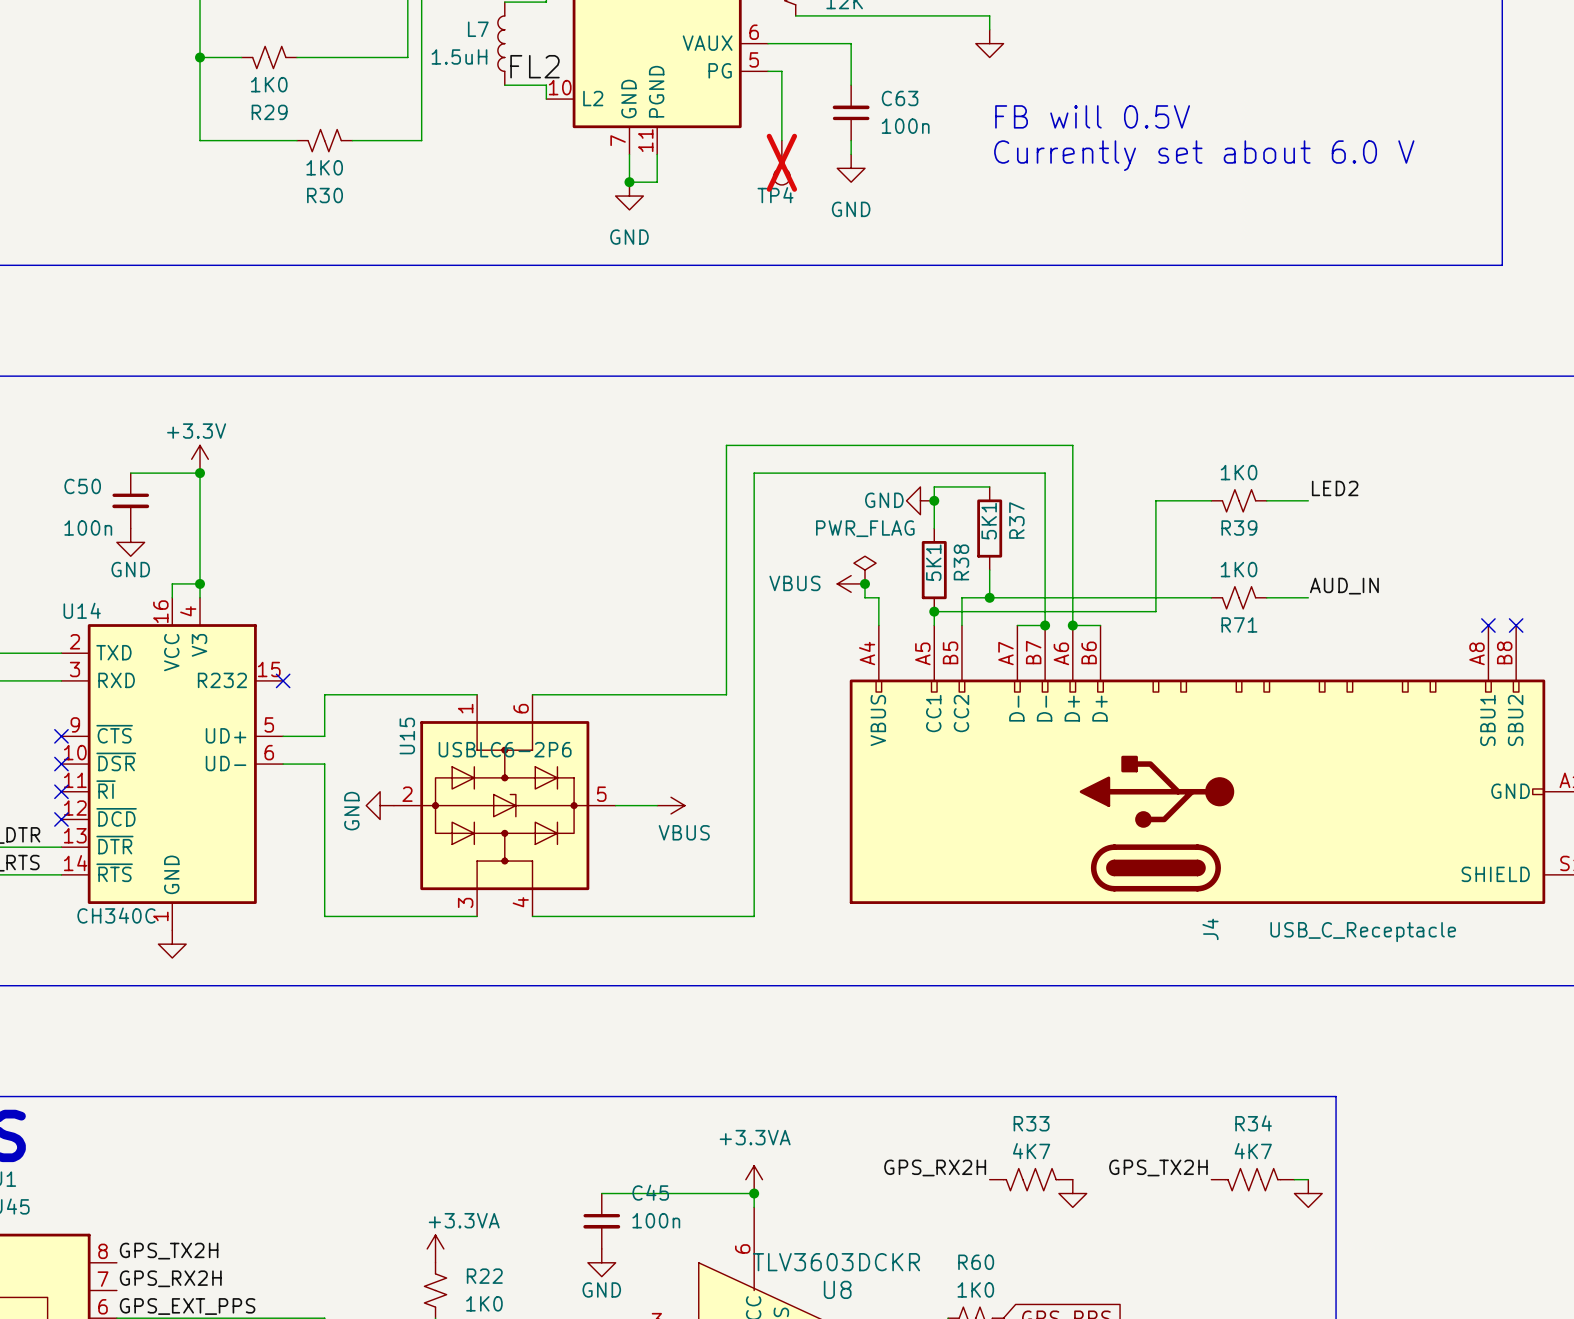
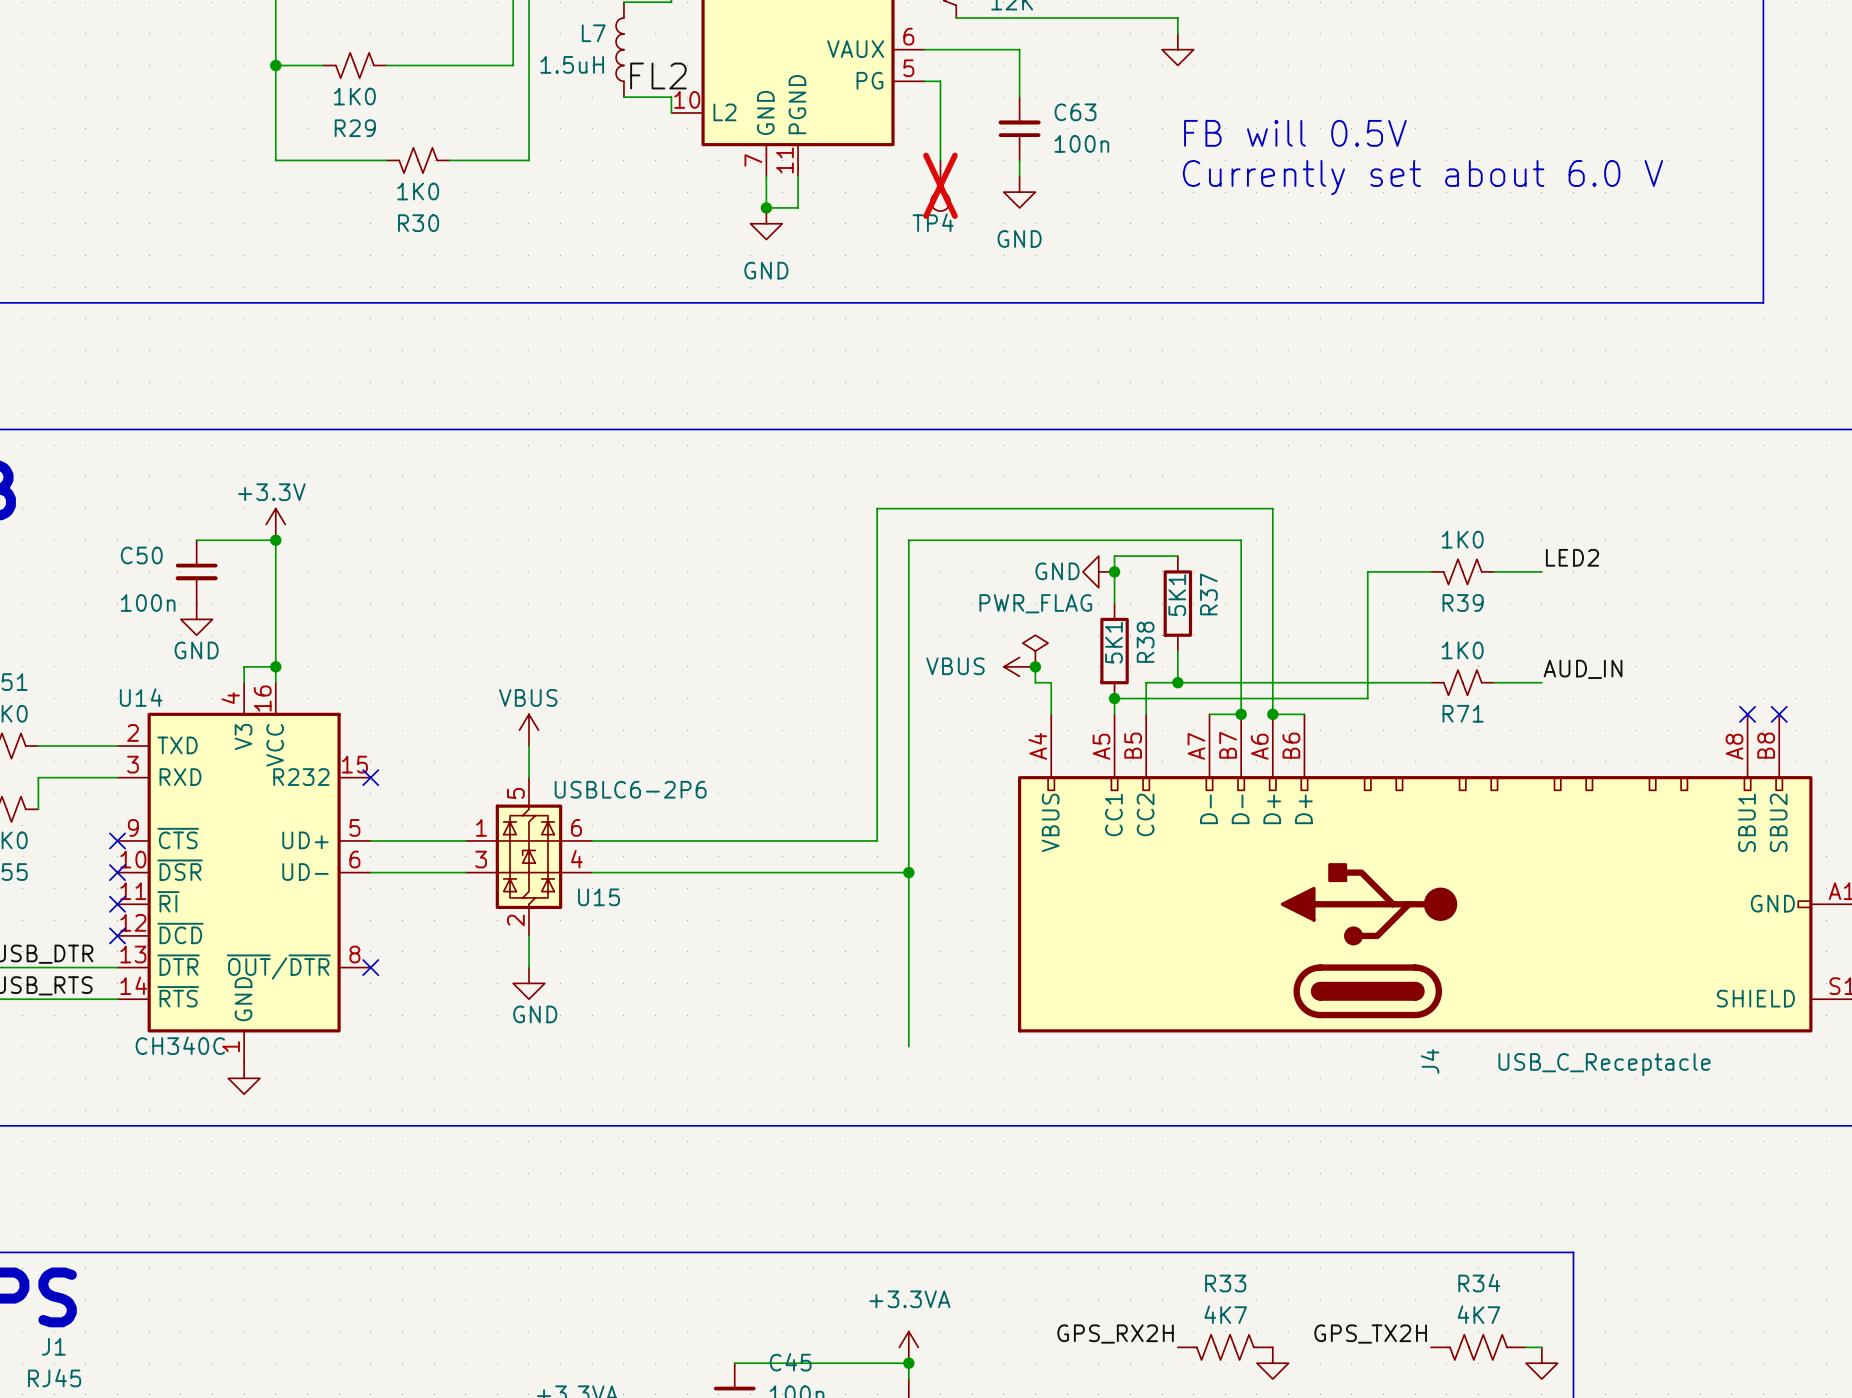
U14 symbol: [61, 597, 284, 931] -> [117, 682, 371, 1063]
power symbol: none -> VBUS (528, 730)
wire: none -> (528, 746) (528, 777)
U15 symbol: [393, 694, 616, 917] -> [465, 777, 593, 936]
wire: (477, 694) (324, 694) (324, 736) -> (465, 840) (418, 840)
wire: (532, 694) (726, 694) -> (592, 840) (877, 840) (877, 793)
U15 name position: U15 (407, 736) -> U15 (599, 897)
U15 value position: USBLC6-2P6 (505, 749) -> USBLC6-2P6 (630, 789)
wire: (324, 764) (324, 916) (477, 916) -> (418, 872) (465, 872)
wire: none -> (592, 872) (908, 872)
junction: none -> (908, 872)
power symbol rotation: 0° (380, 805) -> 90° counterclockwise (528, 983)
power symbol position: GND (380, 805) -> GND (528, 983)
wire: (615, 805) (657, 805) -> none
power symbol: VBUS (671, 805) -> none
no-connect mark: none -> (370, 967)
wire: (532, 916) (754, 916) -> none

